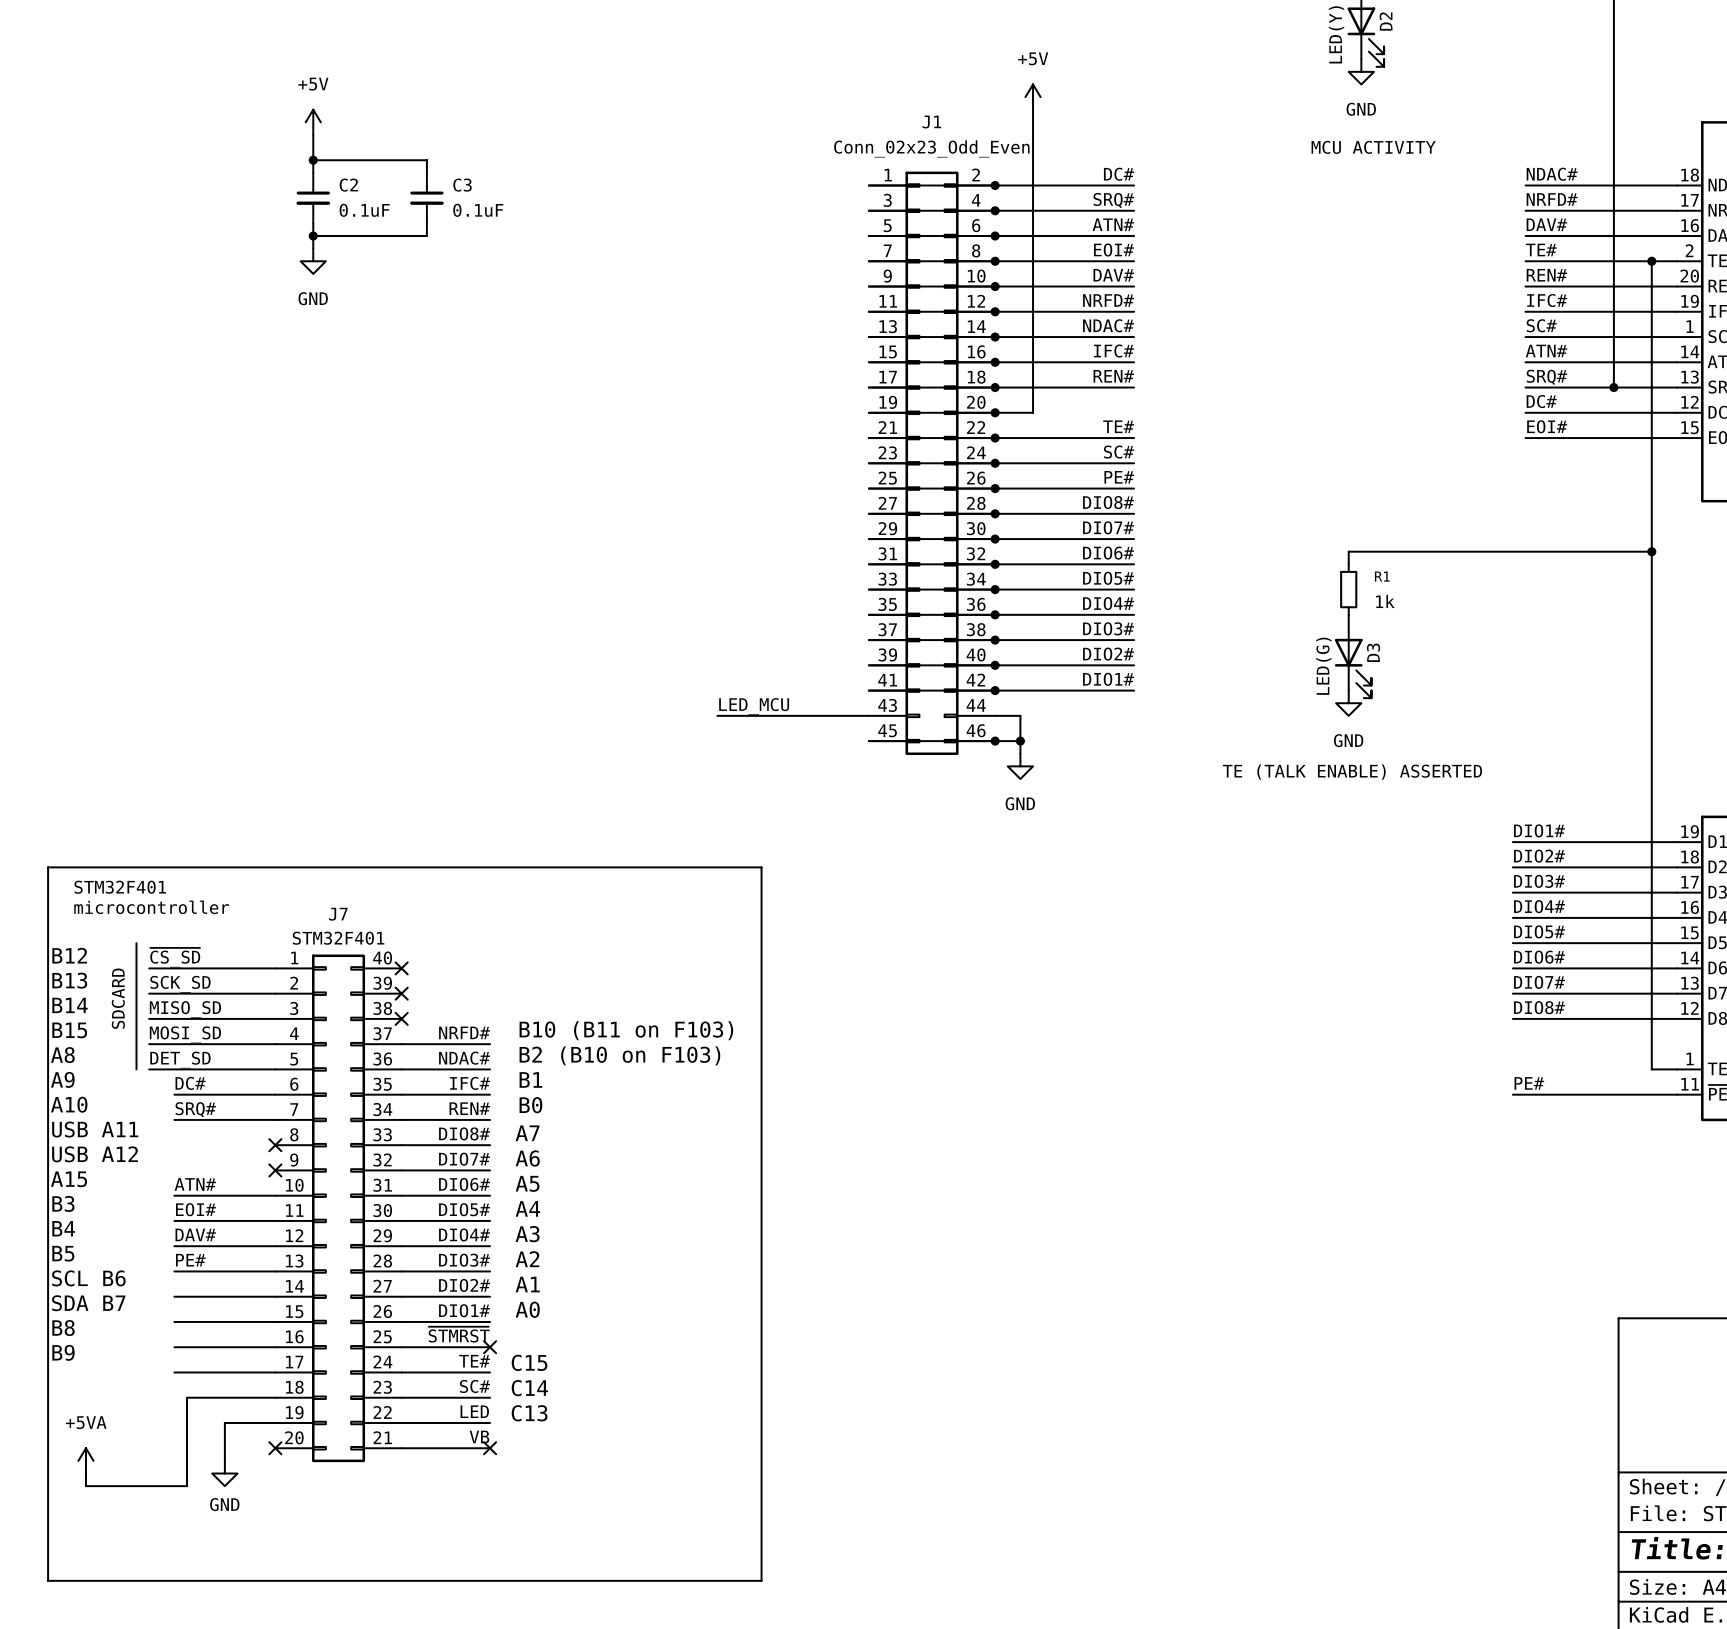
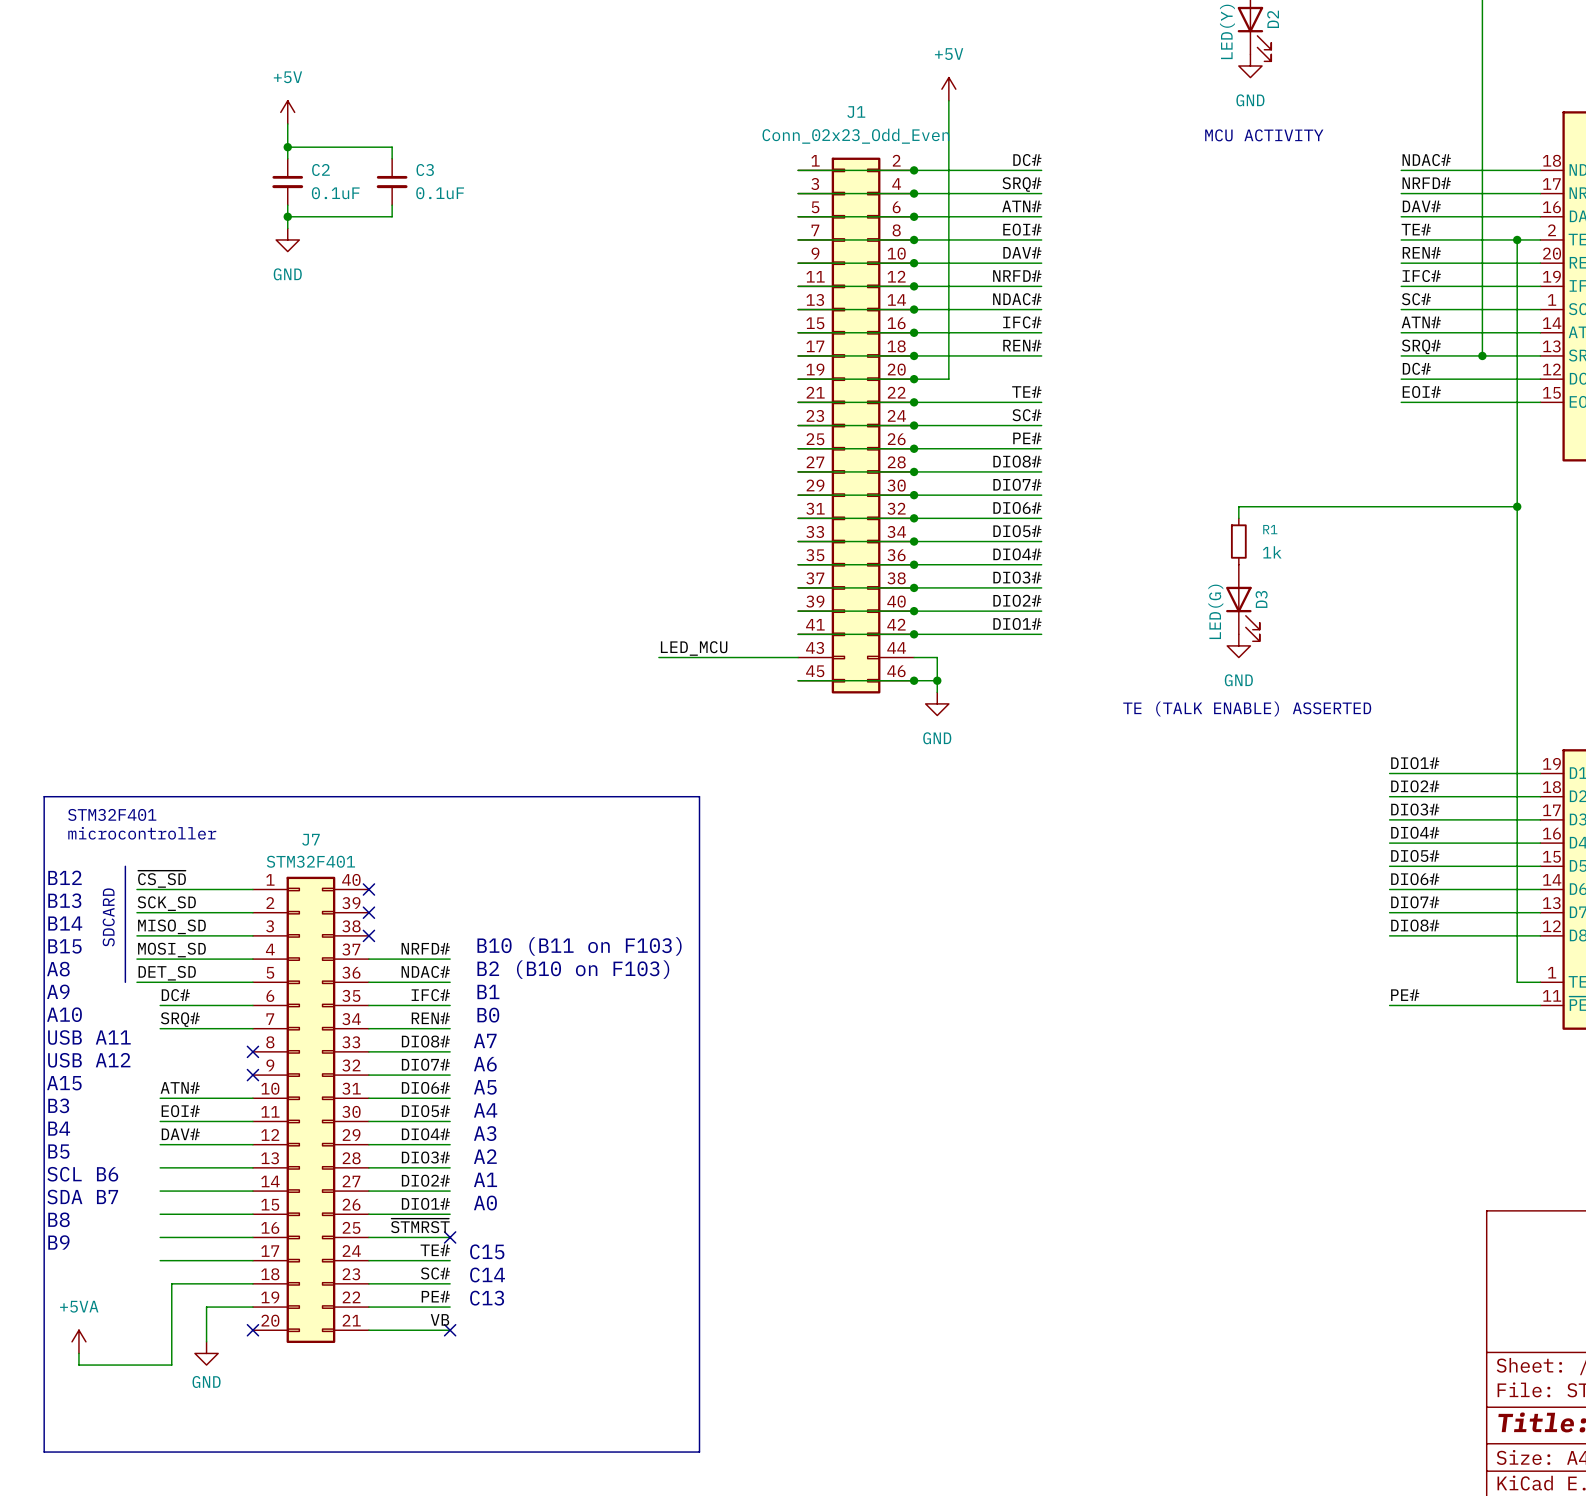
label: PE# (190, 1260) -> none
label: LED (474, 1411) -> PE# (435, 1296)

